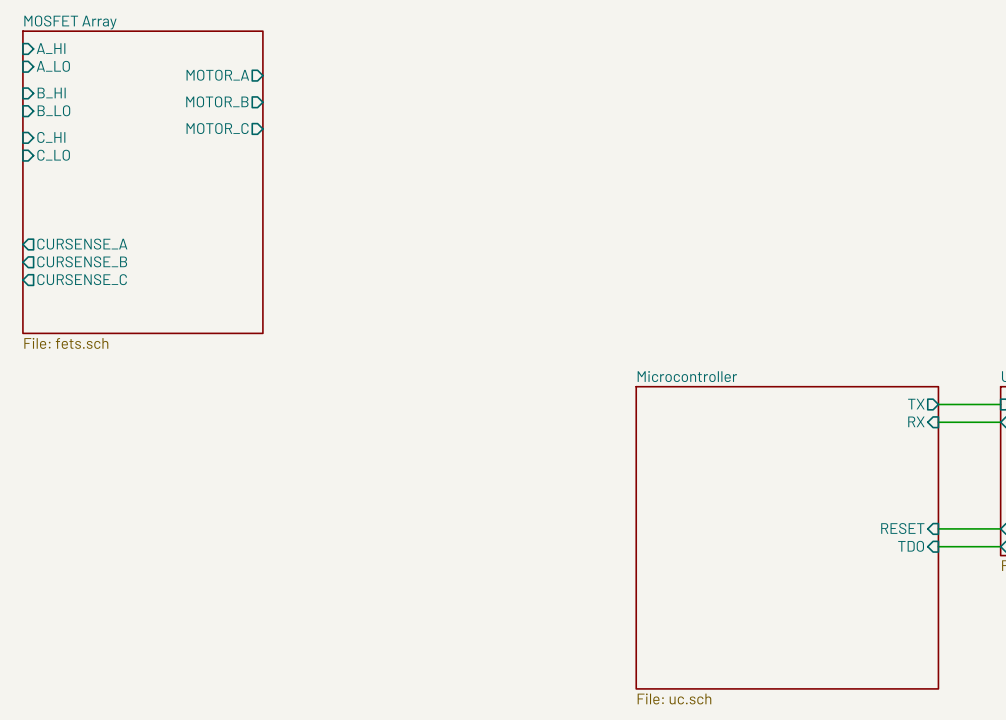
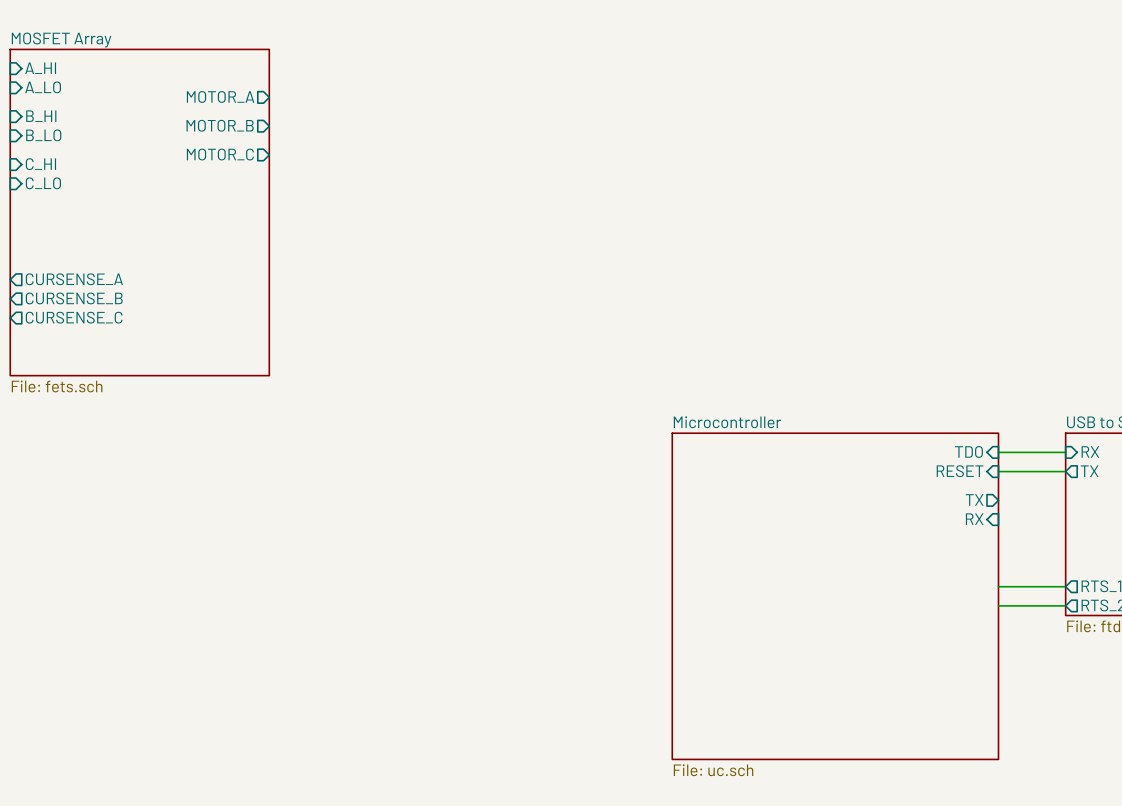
sheet pin shape: output (916, 404) -> input (968, 451)
sheet pin: TX (916, 404) -> TDO (968, 451)
sheet pin: RX (916, 421) -> RESET (960, 471)
sheet pin: none -> TX (974, 499)
sheet pin: none -> RX (974, 519)
sheet pin: RESET (902, 528) -> none
sheet pin: TDO (911, 546) -> none

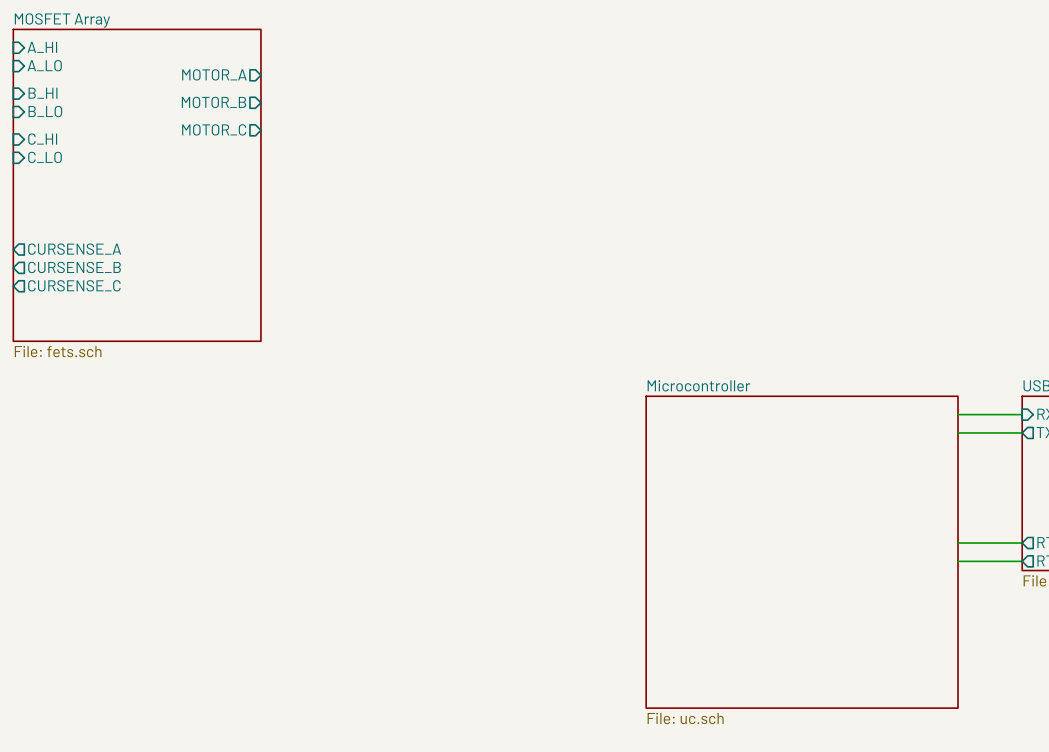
sheet pin: TDO (968, 451) -> none
sheet pin: RESET (960, 471) -> none
sheet pin: TX (974, 499) -> none
sheet pin: RX (974, 519) -> none

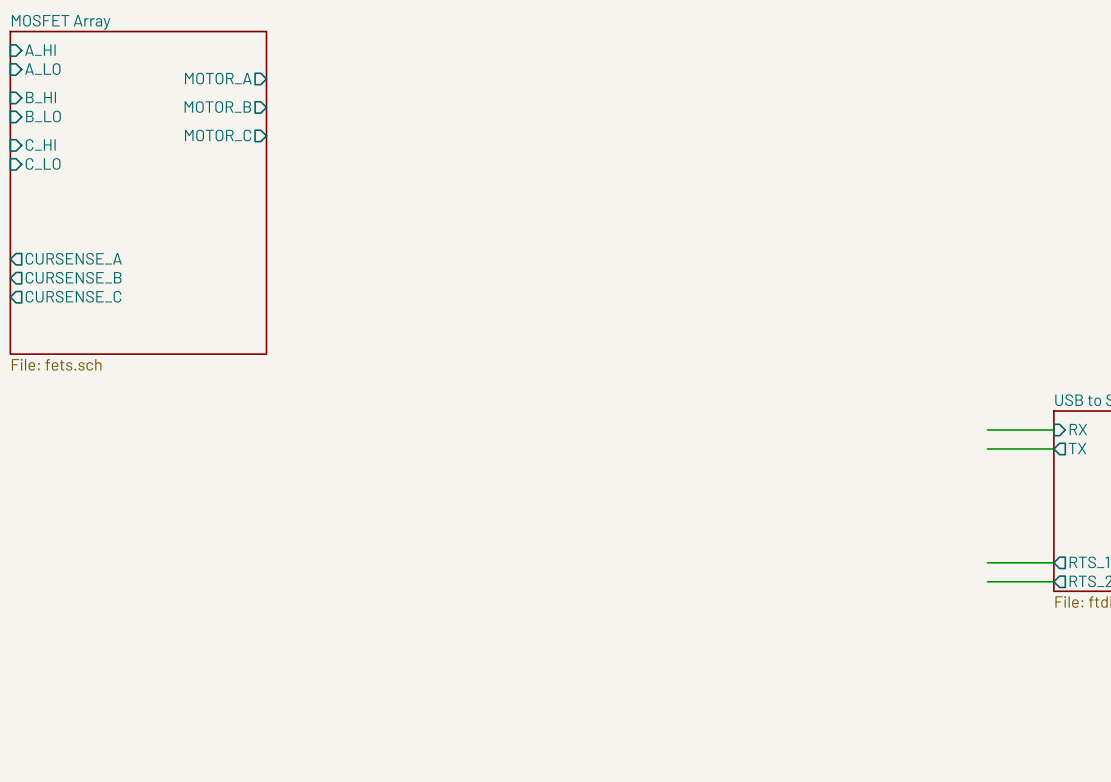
sheet Microcontroller: File: uc.sch (802, 552) -> none

